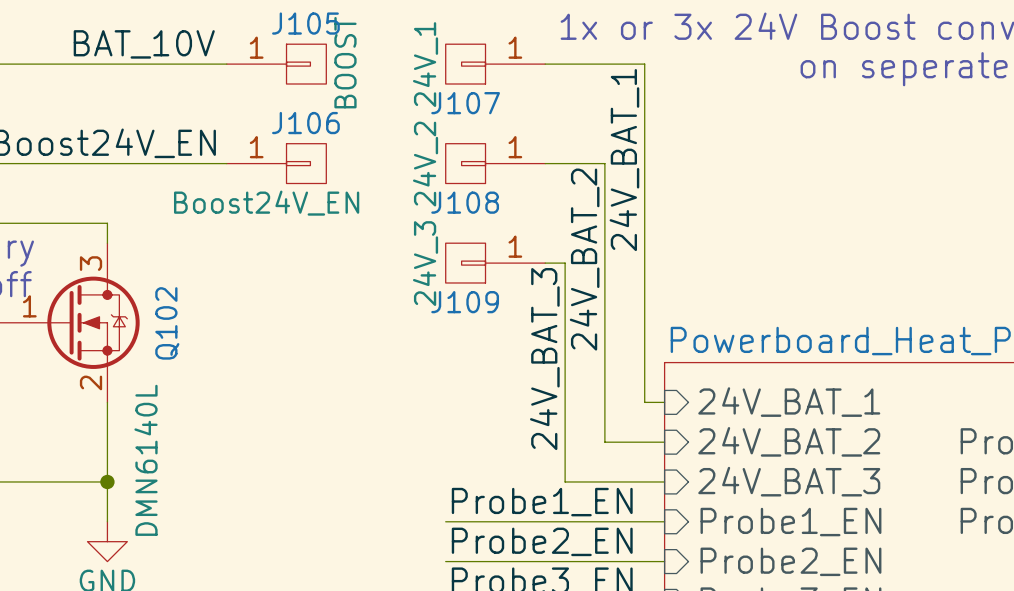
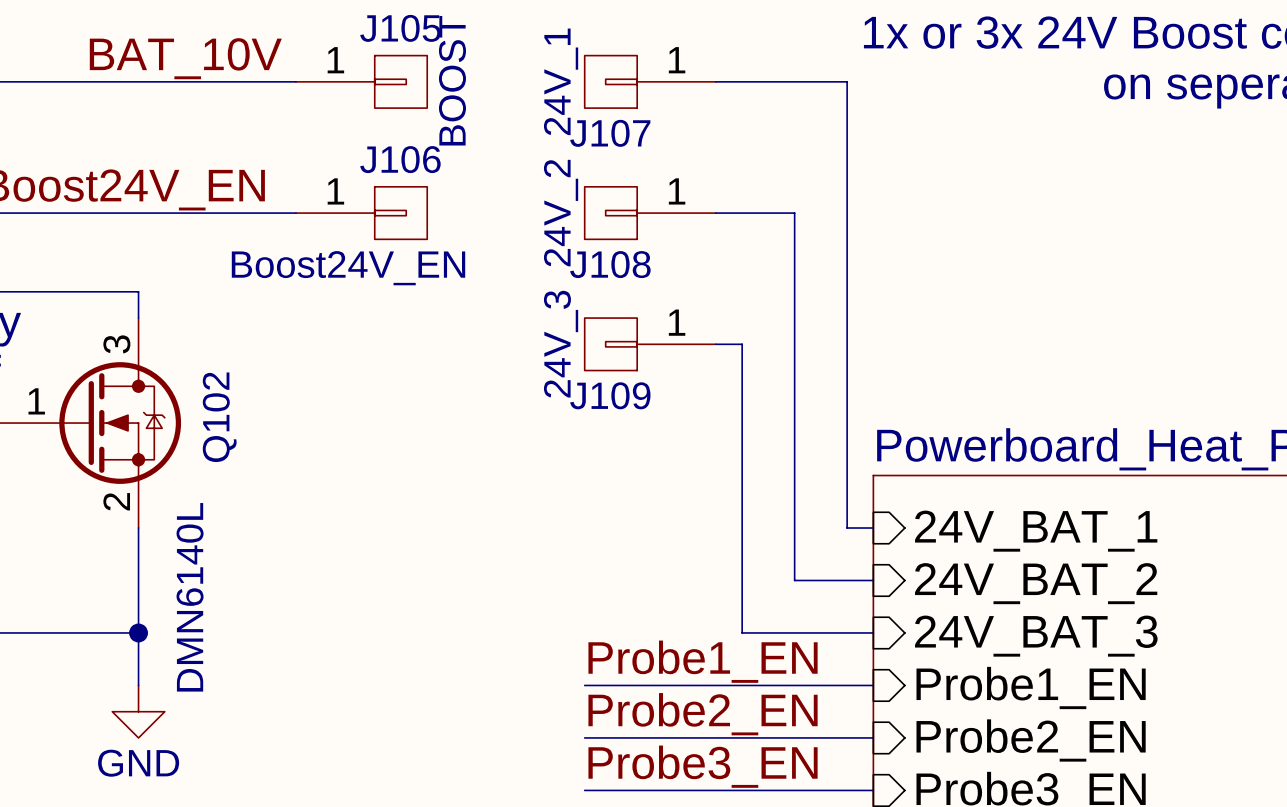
label: 24V_BAT_1 (624, 160) -> none
label: 24V_BAT_2 (584, 259) -> none
label: 24V_BAT_3 (544, 359) -> none

